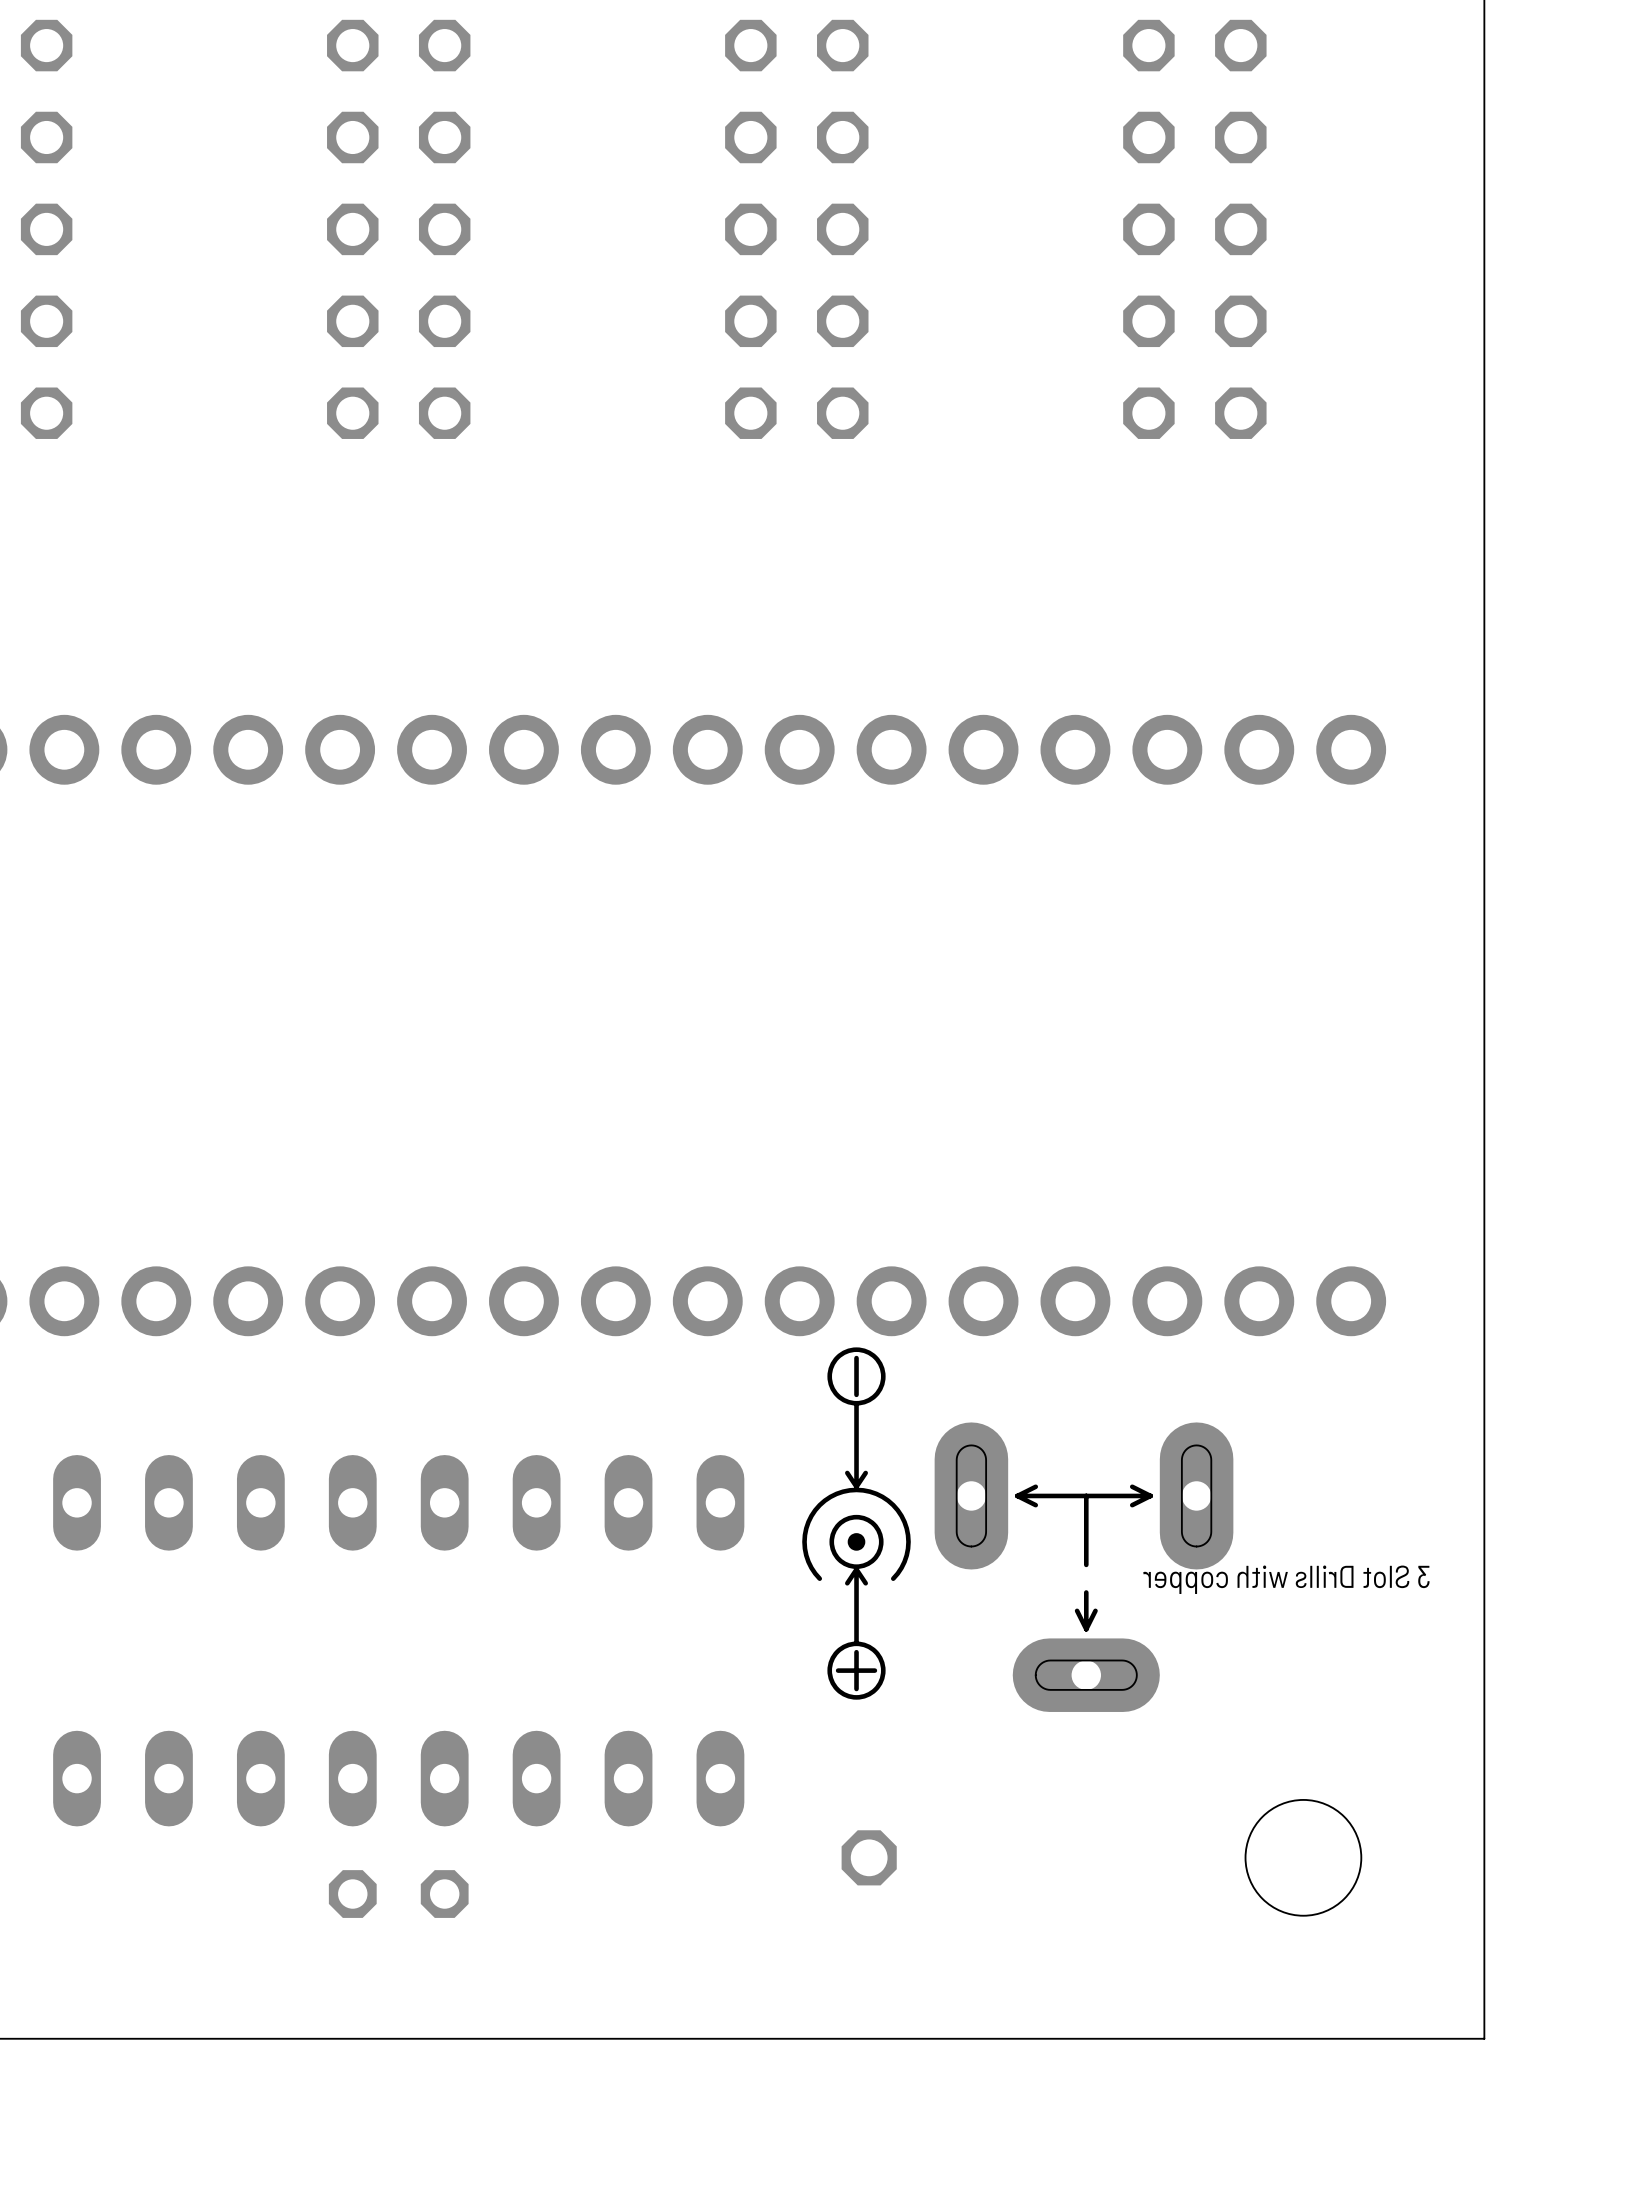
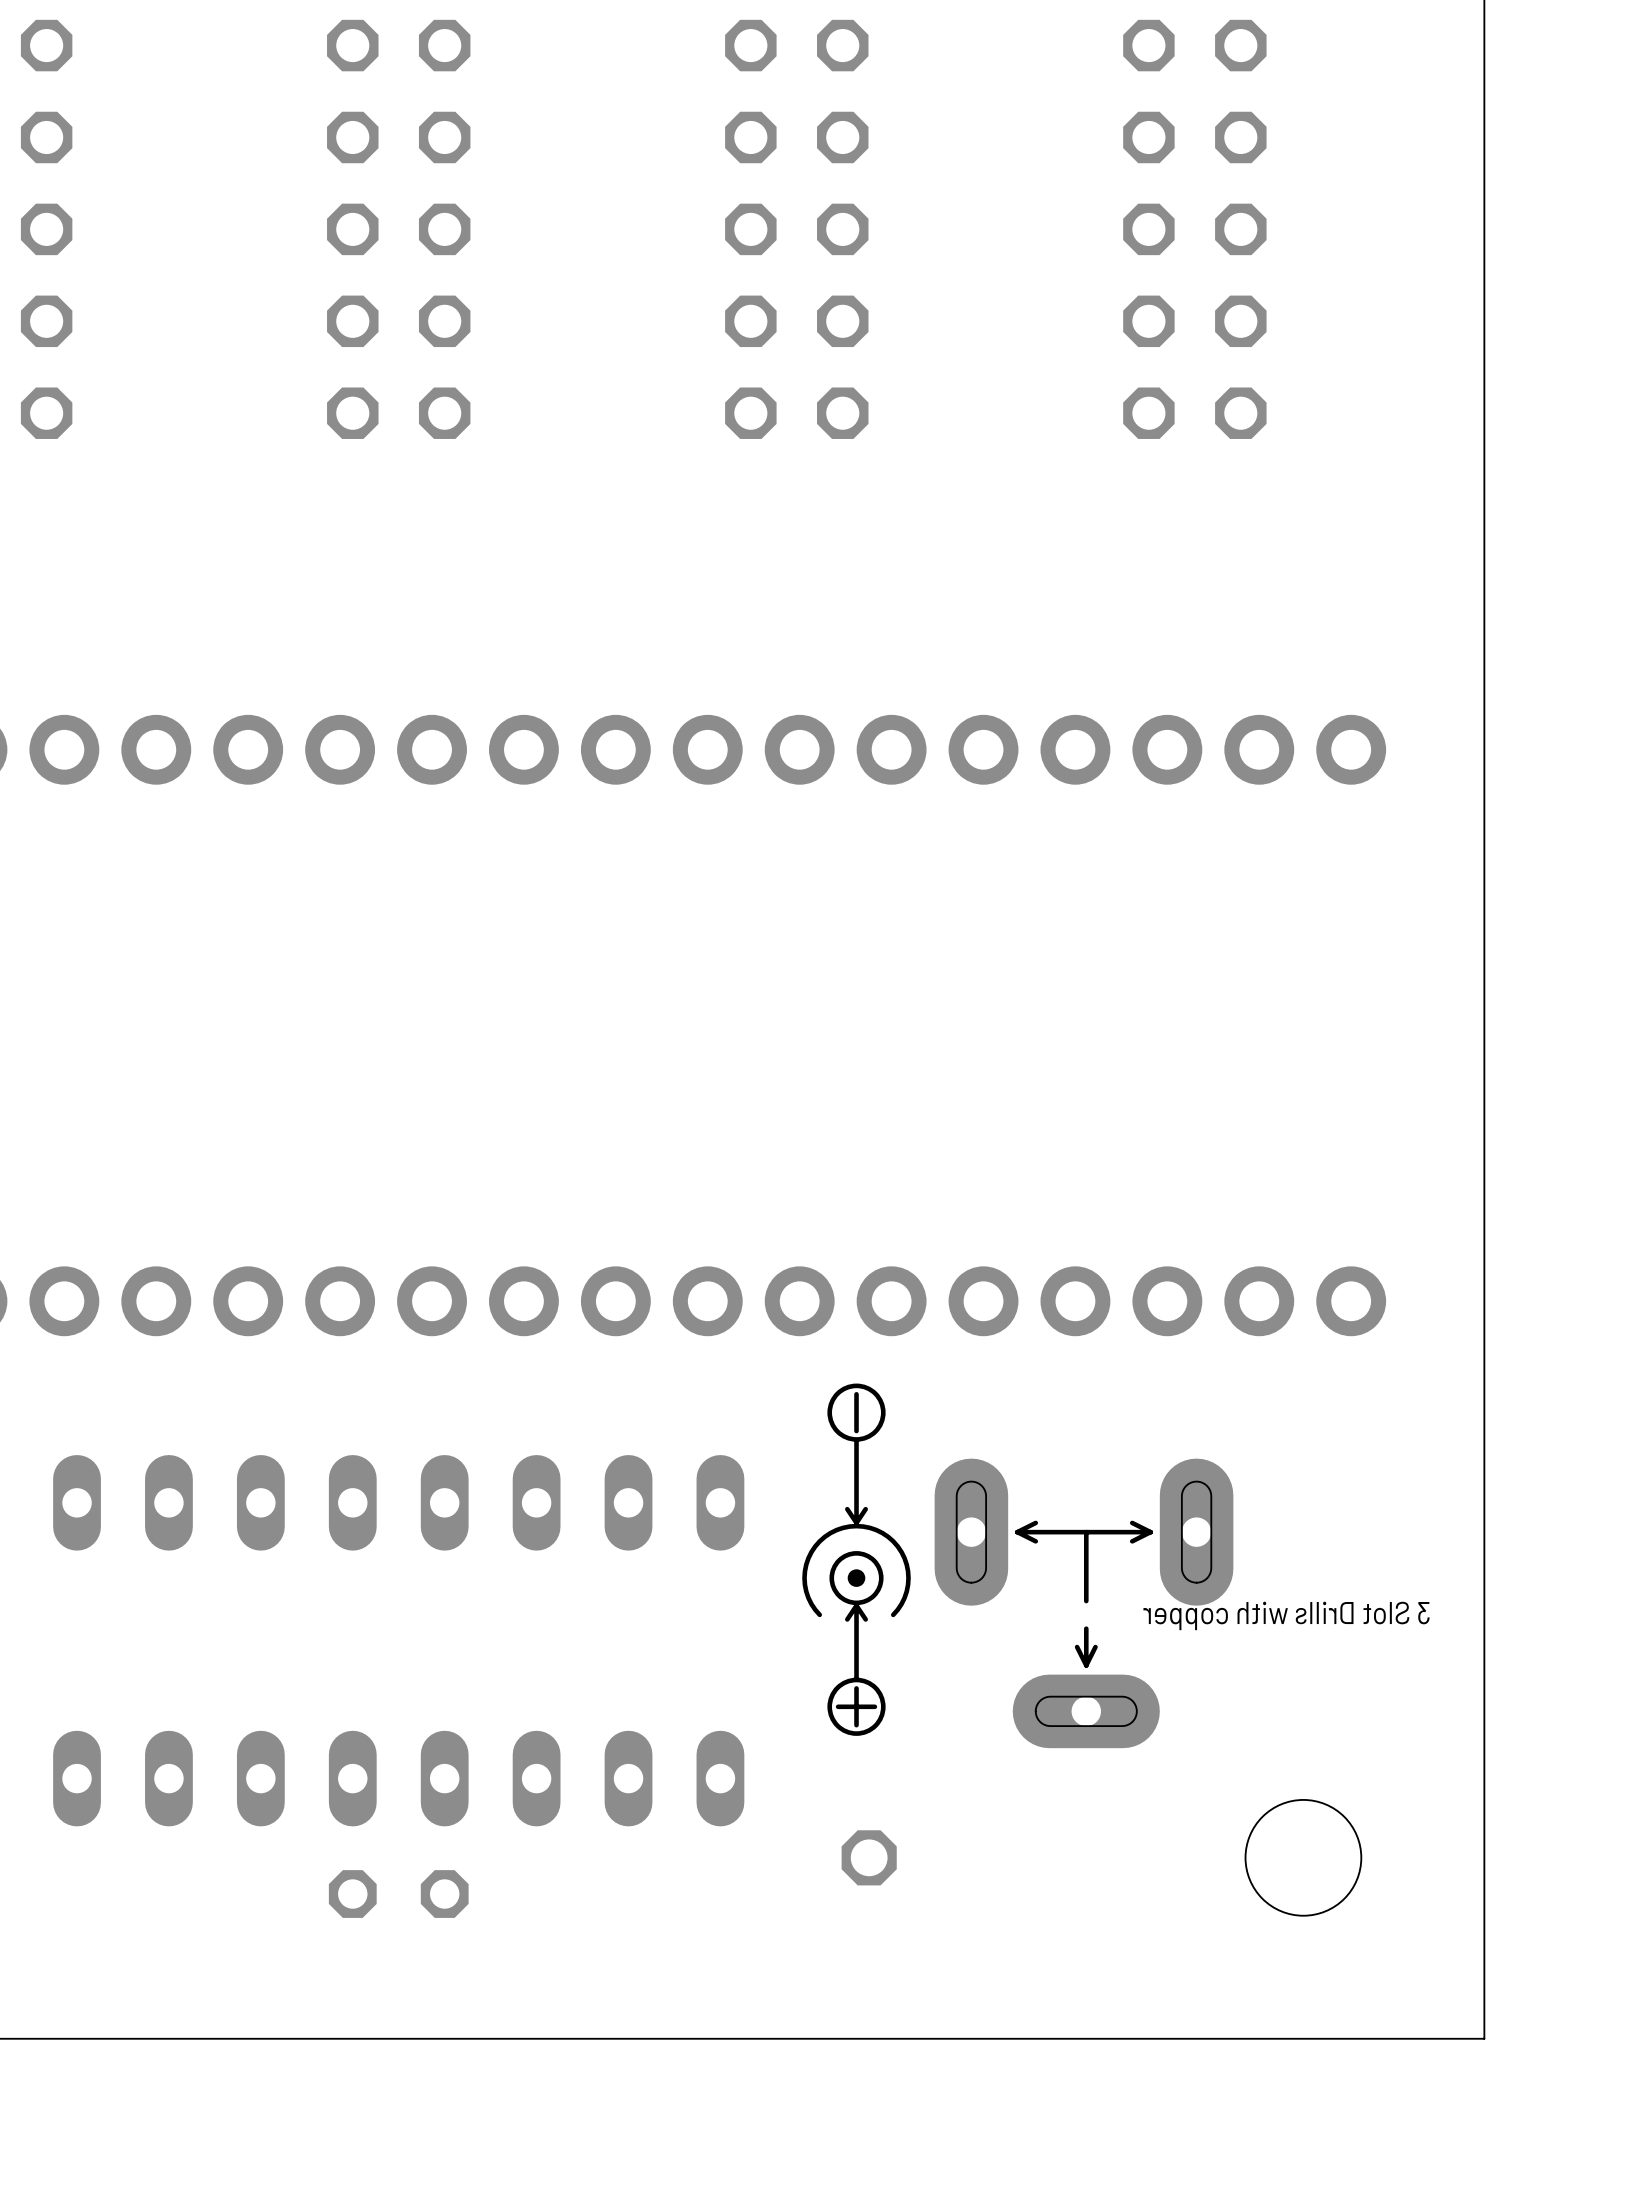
part position: (1017, 1529) -> (1017, 1565)

